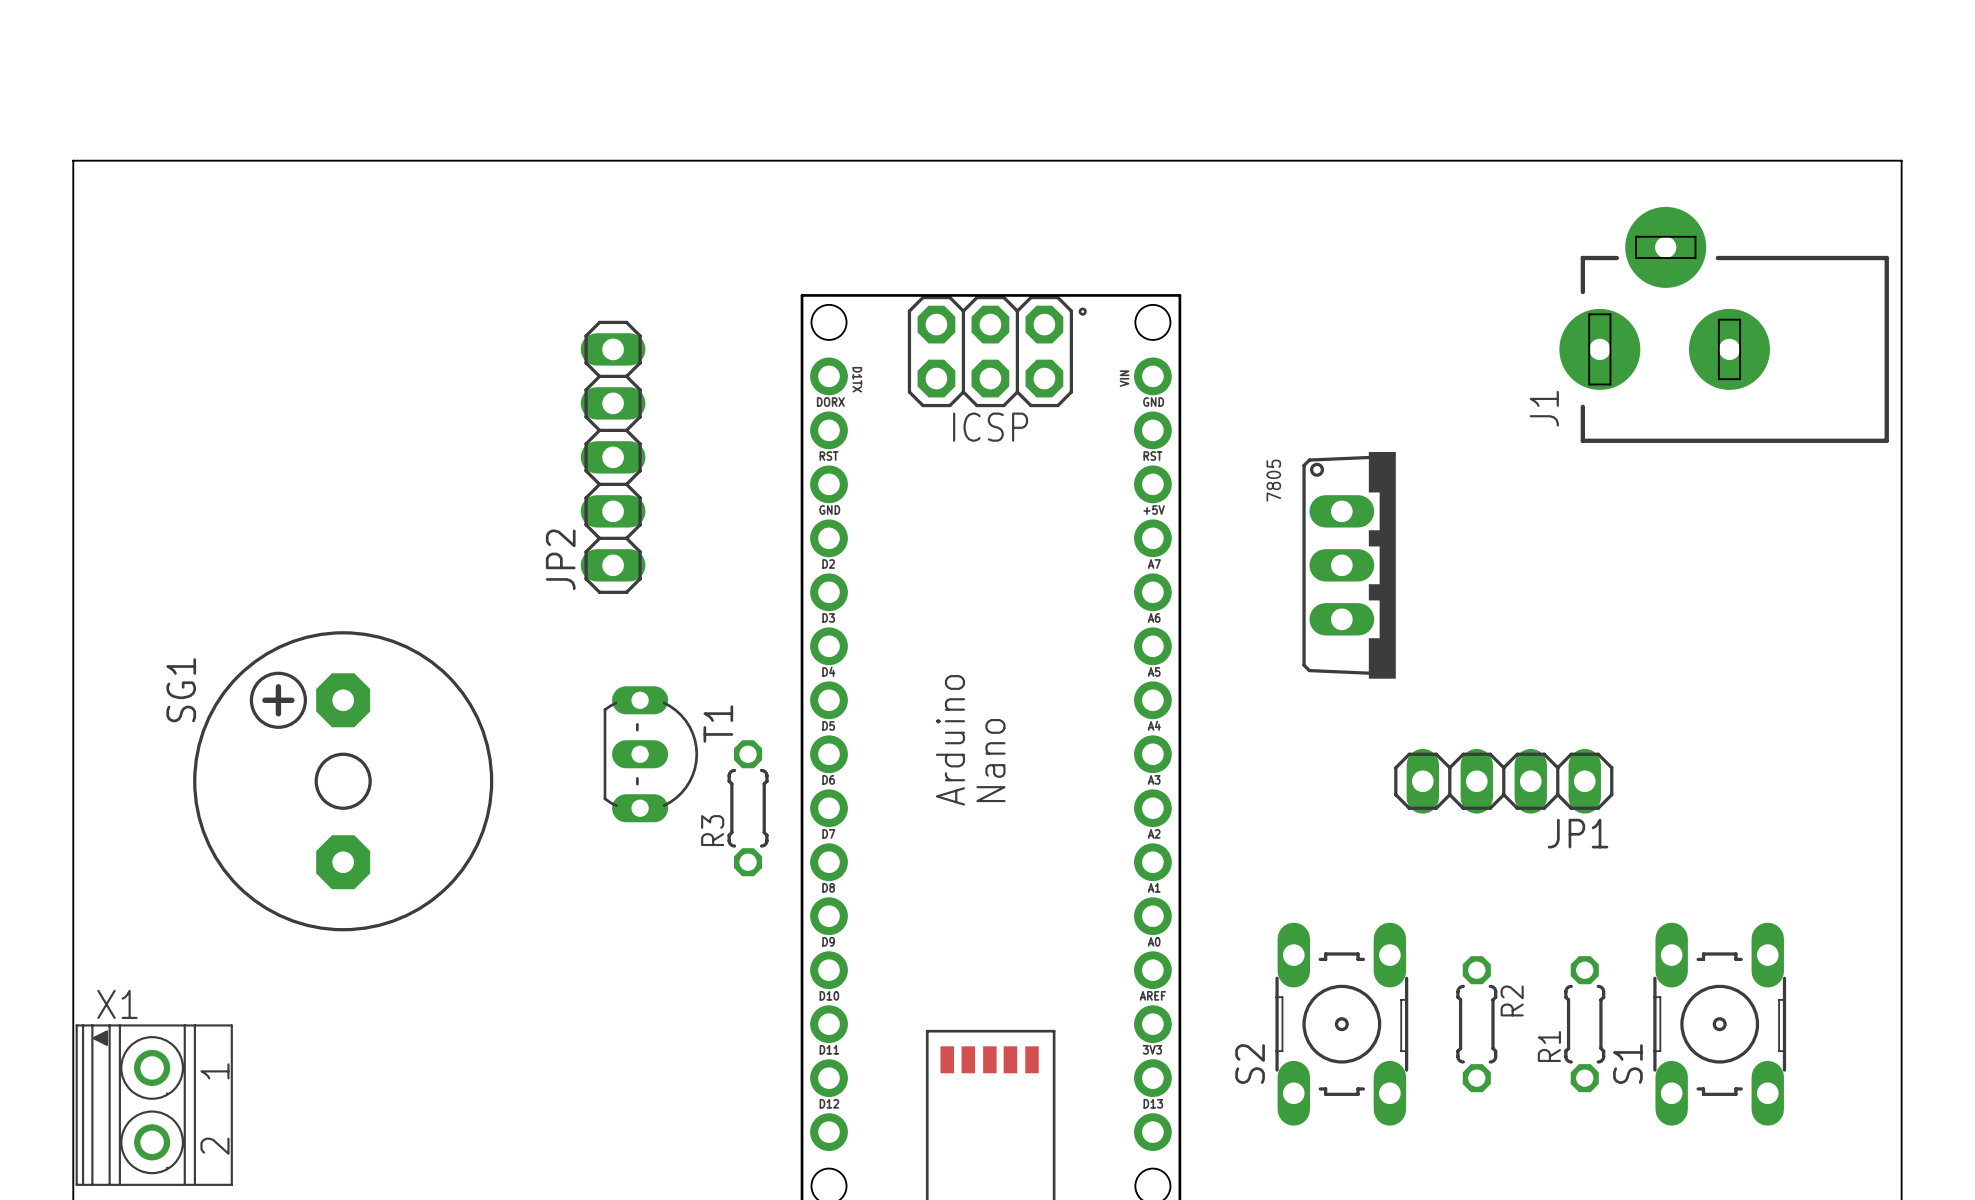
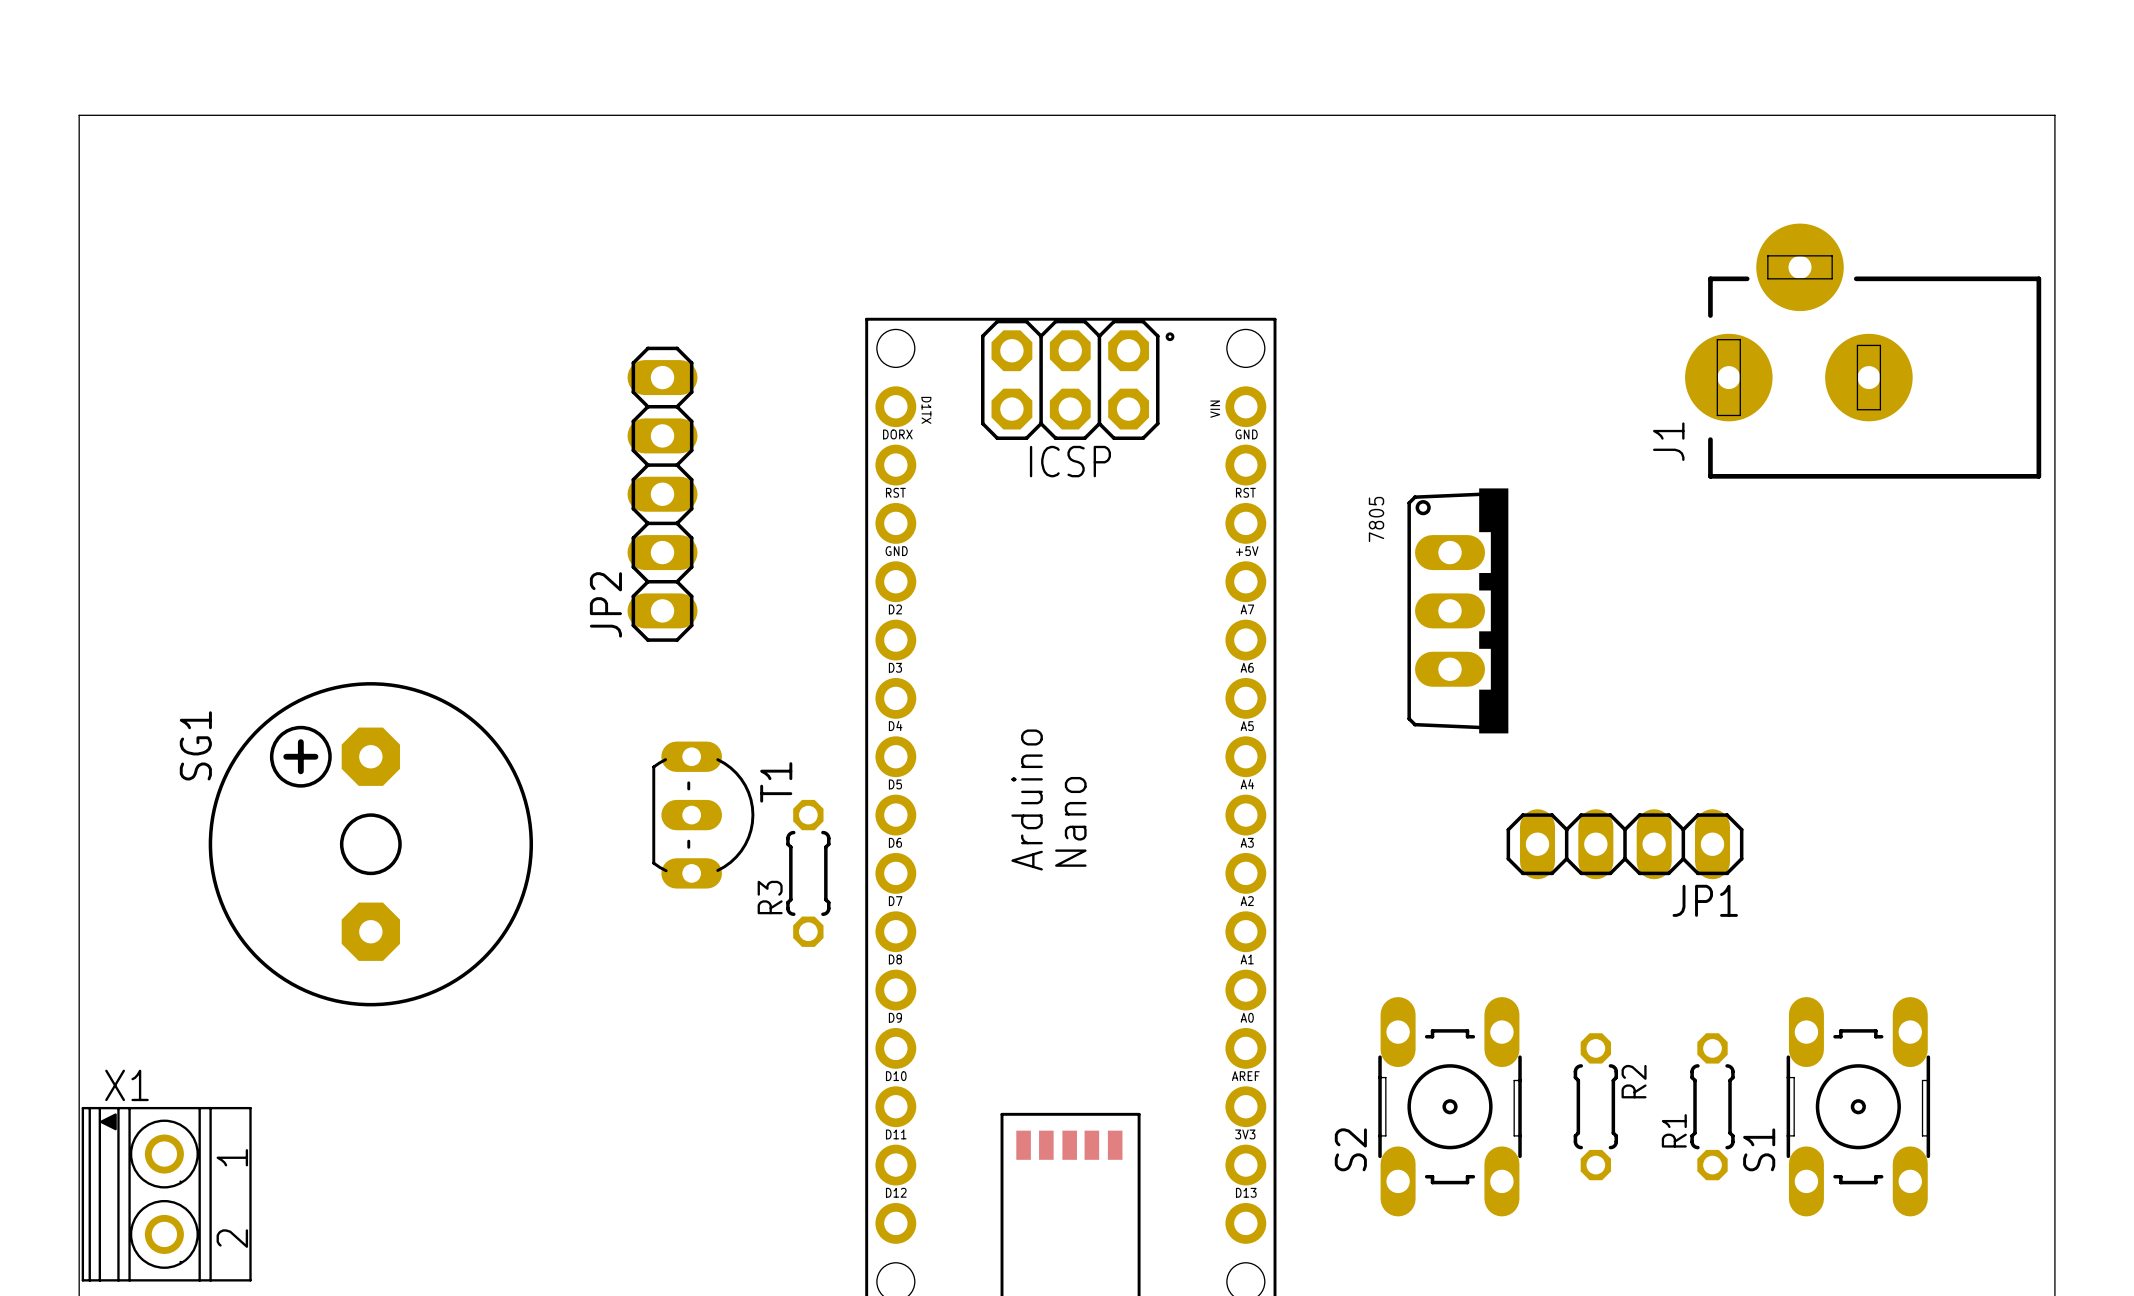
board edge: (73, 160) (1901, 160) -> (79, 173) (79, 115) (2054, 115) (2054, 173)

